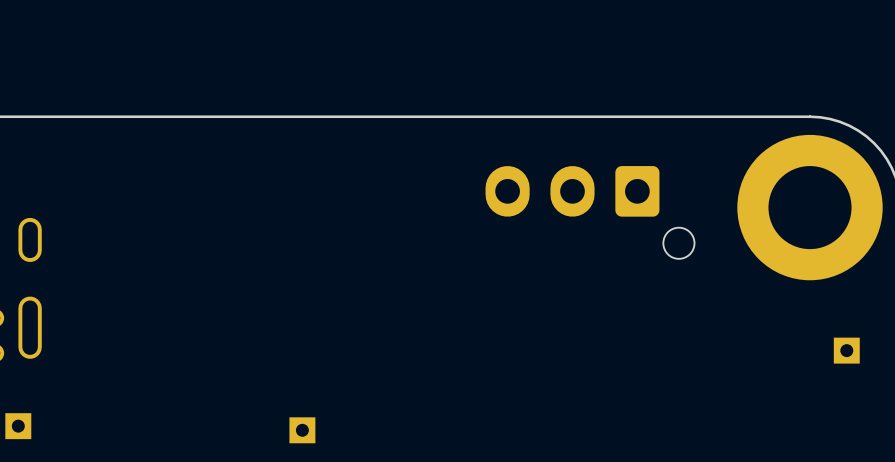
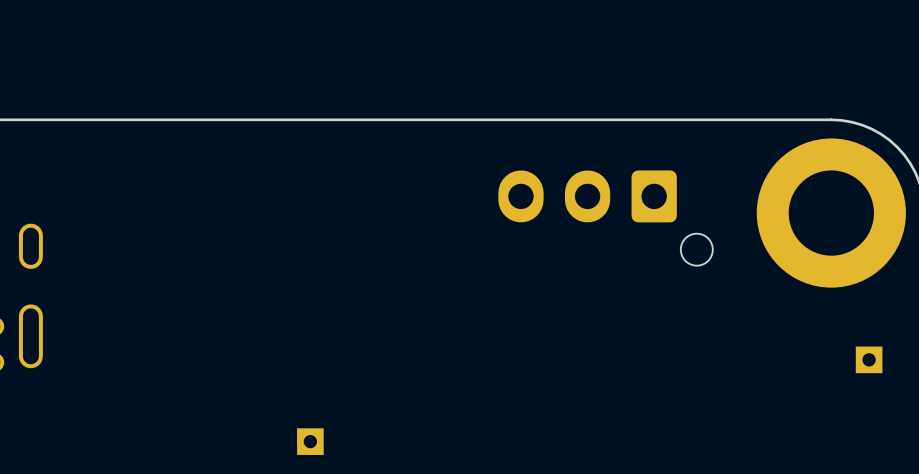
part: (18, 426) -> none

